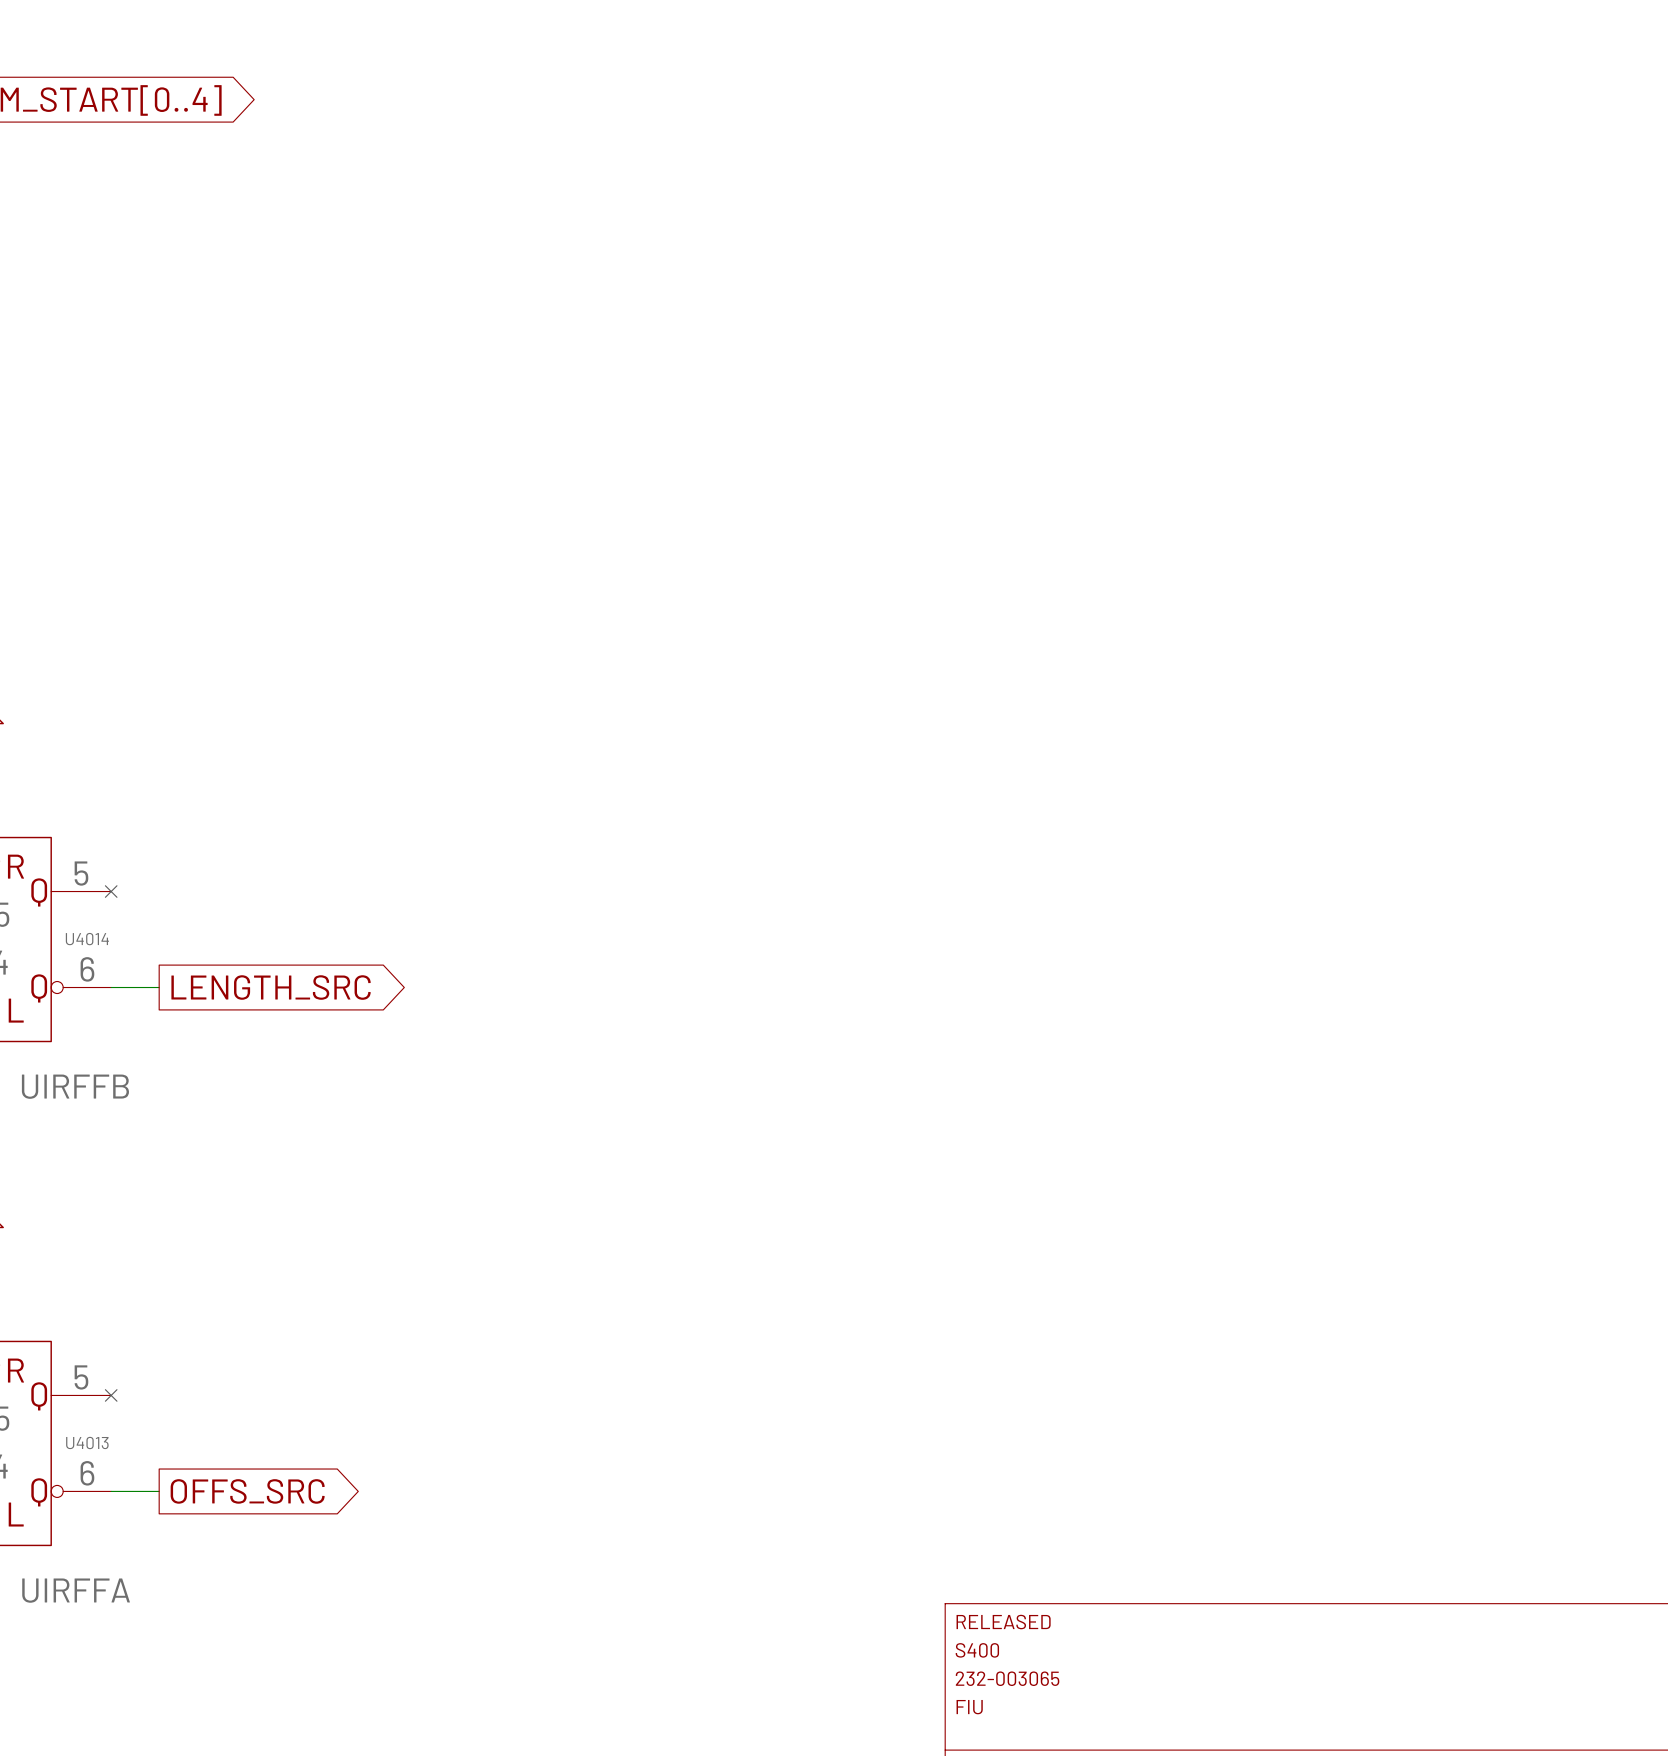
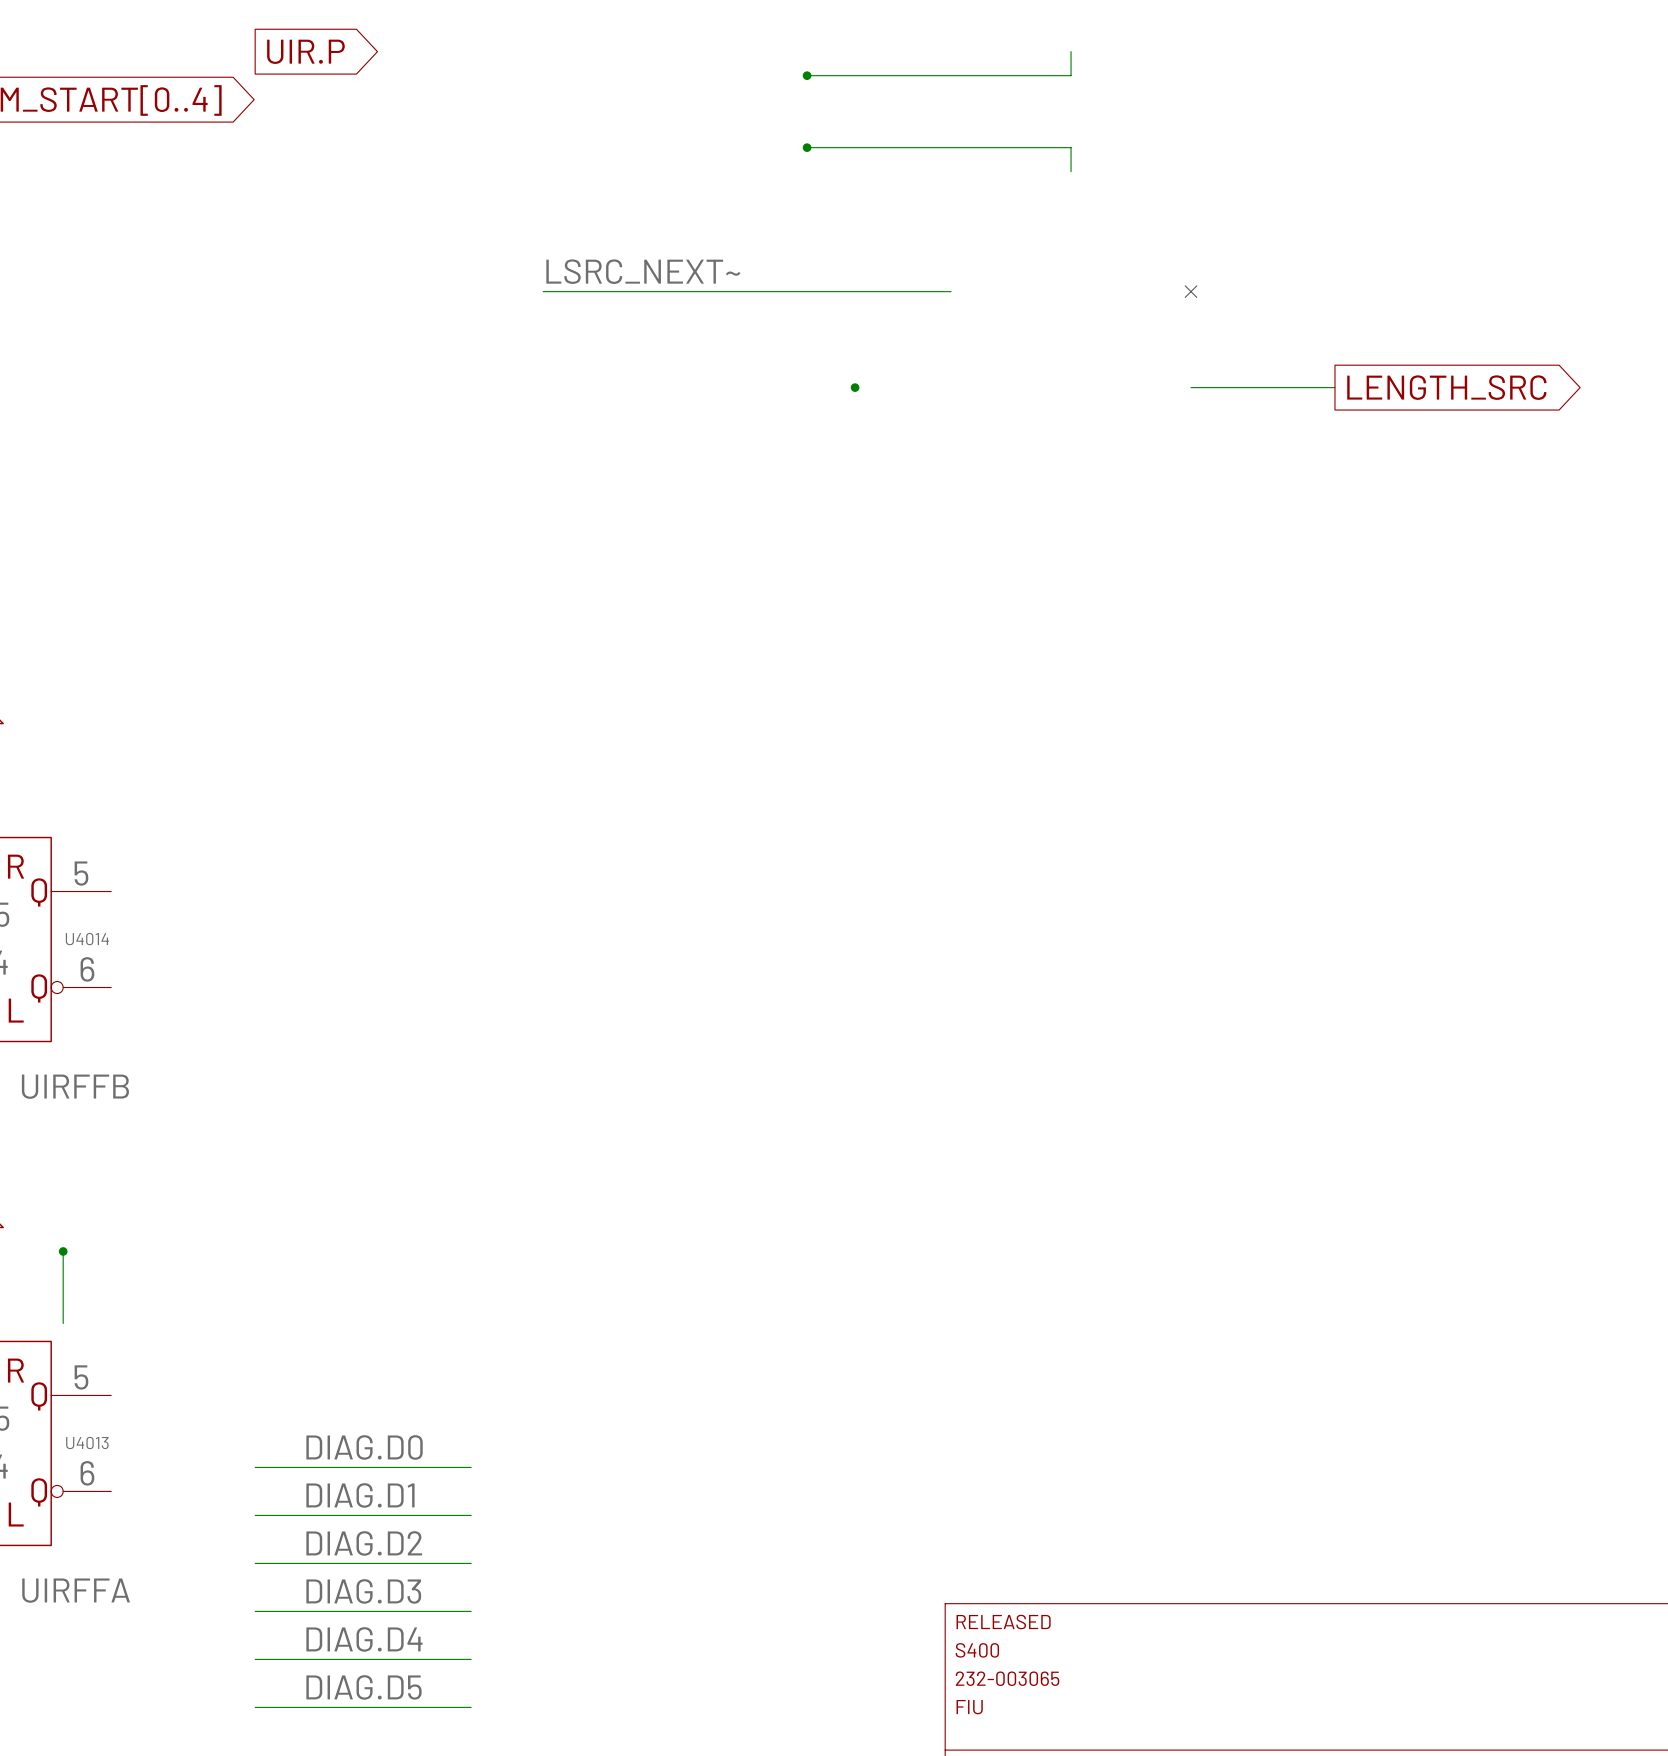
global label: none -> UIR.P (305, 51)
wire: none -> (1071, 51) (1071, 75) (807, 75)
junction: none -> (807, 75)
wire: none -> (807, 147) (1071, 147) (1071, 171)
junction: none -> (807, 147)
label: none -> LSRC_NEXT~ (643, 271)
wire: none -> (543, 291) (951, 291)
no-connect mark: none -> (1191, 291)
junction: none -> (855, 387)
wire: none -> (1191, 387) (1334, 387)
global label: none -> LENGTH_SRC (1446, 387)
no-connect mark: (111, 891) -> none
wire: (111, 987) (159, 987) -> none
global label: LENGTH_SRC (271, 987) -> none
wire: none -> (63, 1251) (63, 1323)
junction: none -> (63, 1251)
no-connect mark: (111, 1395) -> none
label: none -> DIAG.D0 (364, 1447)
wire: none -> (255, 1467) (471, 1467)
wire: (111, 1491) (159, 1491) -> none
global label: OFFS_SRC (247, 1491) -> none
label: none -> DIAG.D1 (360, 1495)
wire: none -> (255, 1515) (471, 1515)
label: none -> DIAG.D2 (364, 1543)
wire: none -> (255, 1563) (471, 1563)
label: none -> DIAG.D3 (363, 1591)
wire: none -> (255, 1611) (471, 1611)
label: none -> DIAG.D4 (364, 1639)
wire: none -> (255, 1659) (471, 1659)
label: none -> DIAG.D5 (364, 1687)
wire: none -> (255, 1707) (471, 1707)

